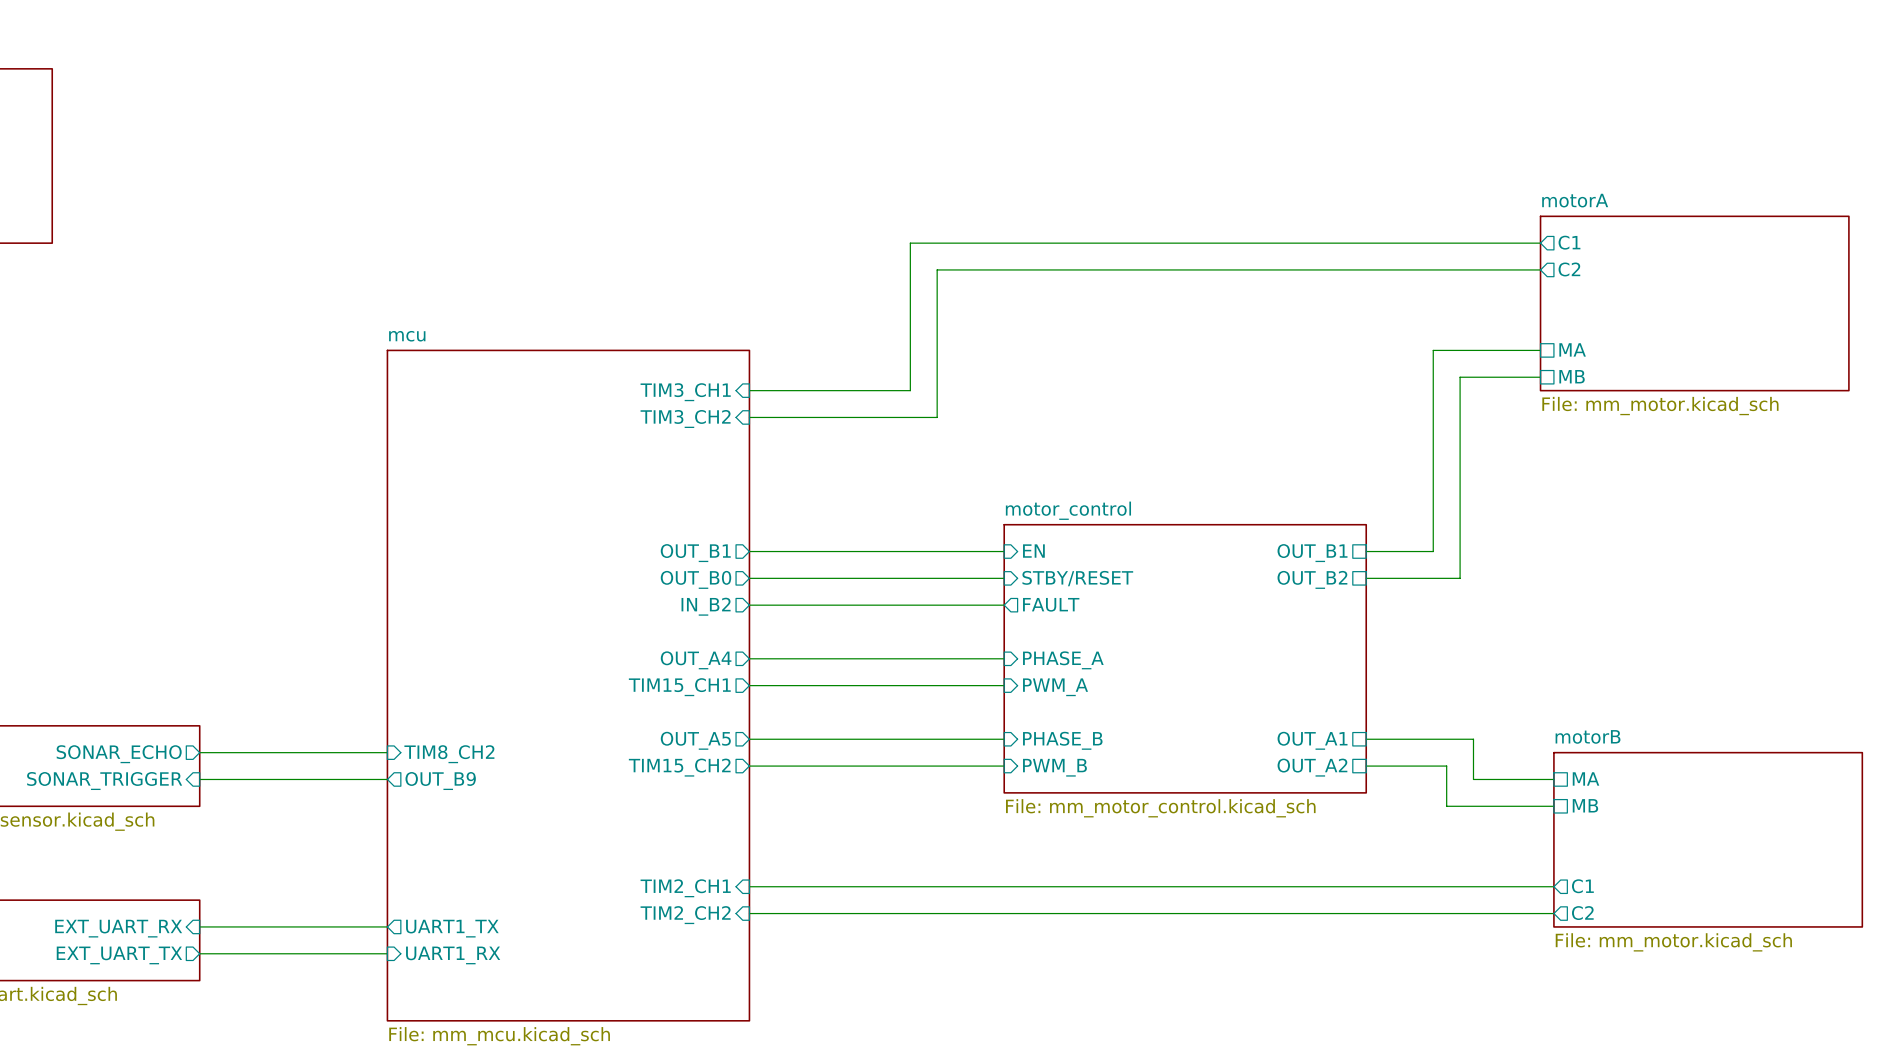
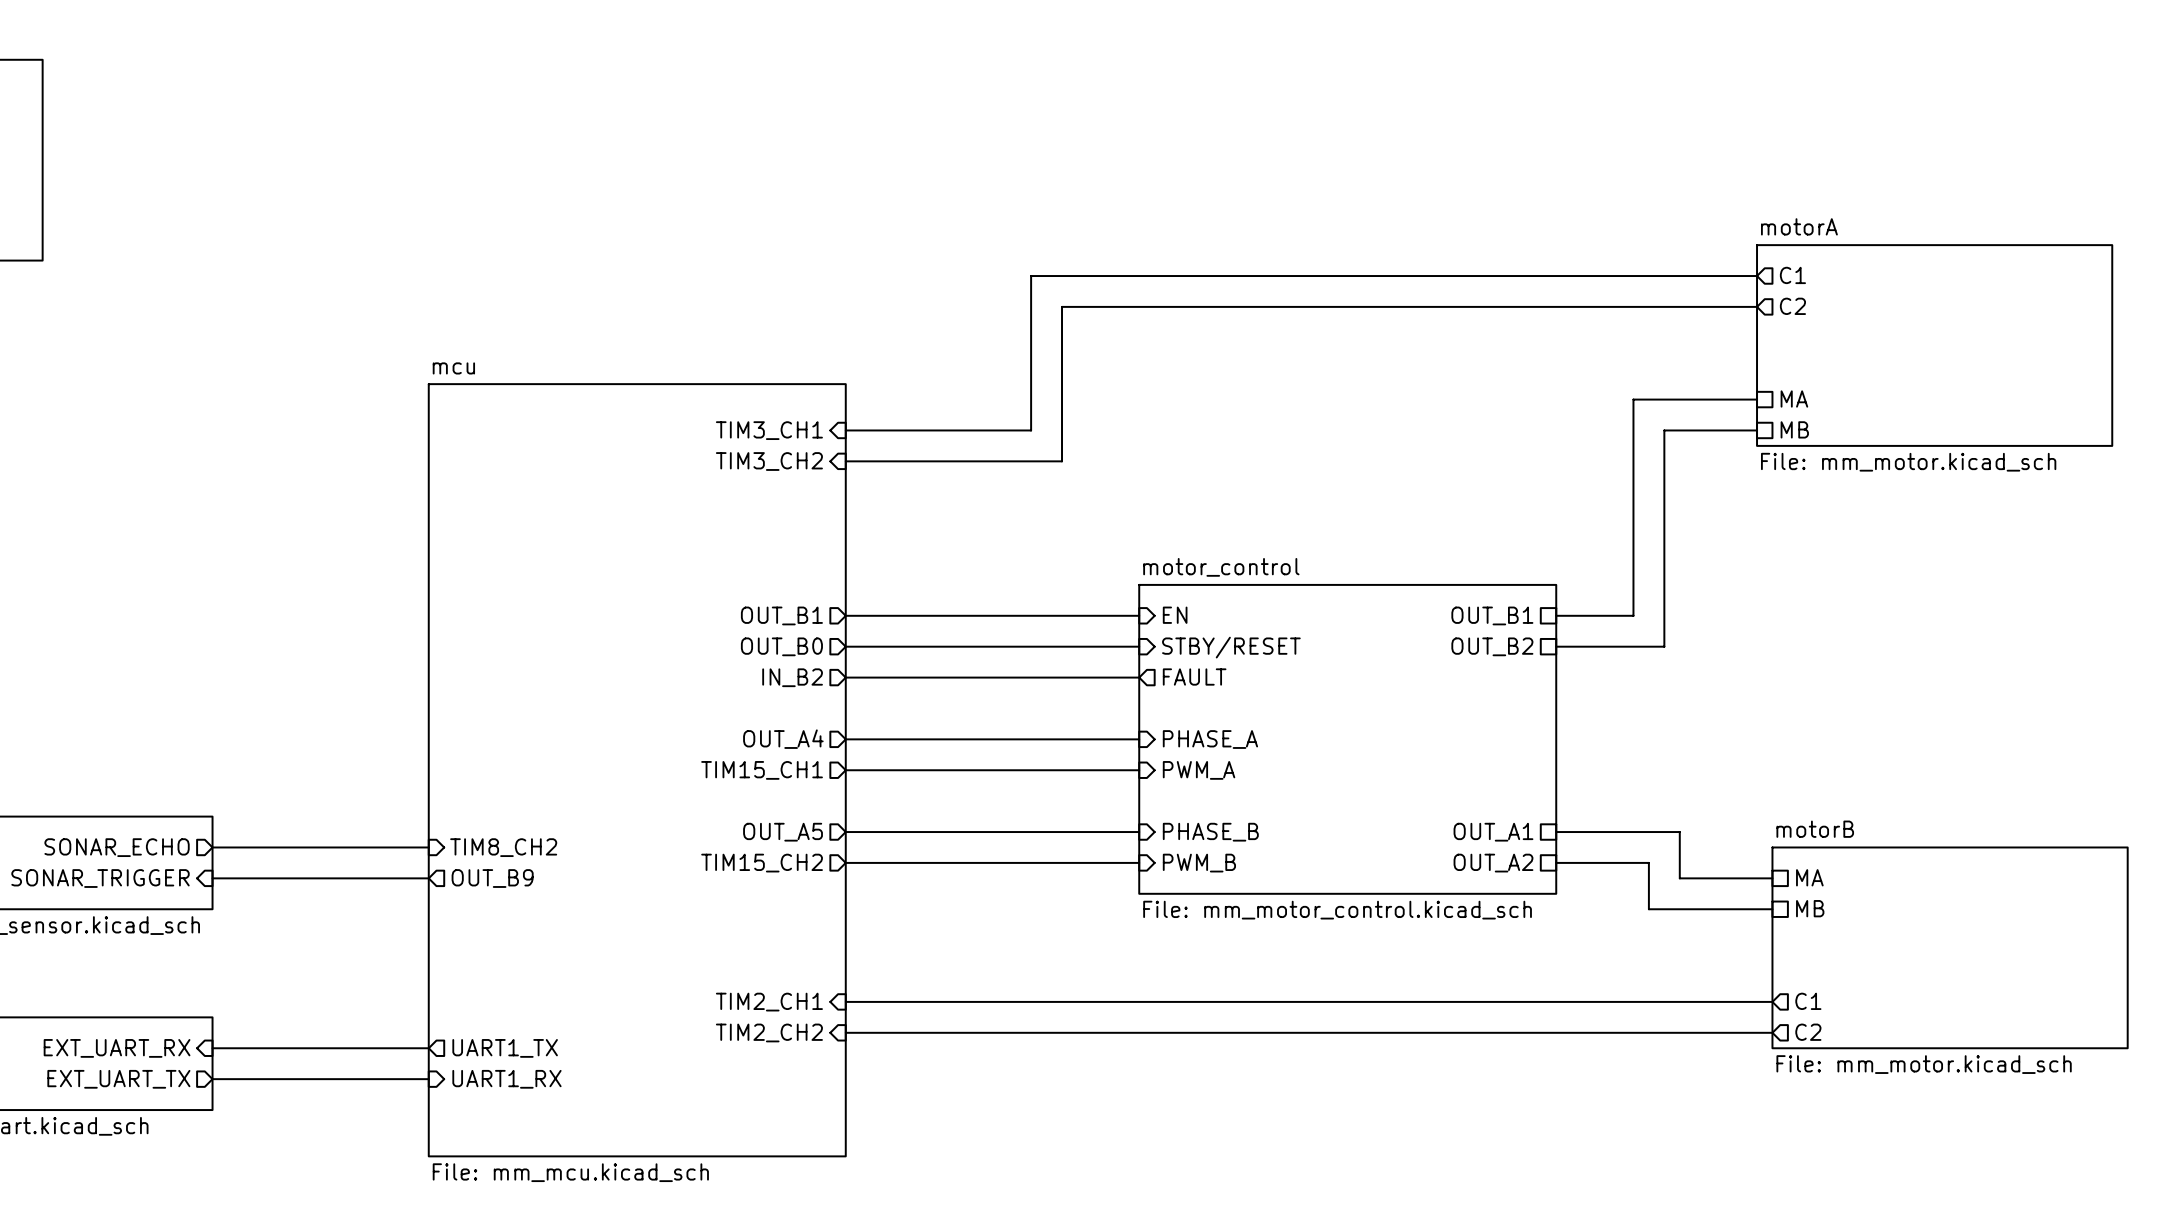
sheet pin position: C1 (1569, 242) -> C1 (1792, 275)
wire: (1540, 243) (910, 243) (910, 256) -> (1757, 276) (1031, 276)
wire: (1540, 269) (937, 269) (937, 283) -> (1757, 306) (1062, 306)
sheet pin position: C2 (1569, 269) -> C2 (1792, 306)
sheet motorA position: (1694, 303) -> (1934, 345)
sheet pin position: MA (1572, 349) -> MA (1794, 399)
wire: (1540, 350) (1433, 350) (1433, 363) -> (1757, 399) (1633, 399)
sheet pin position: MB (1572, 376) -> MB (1794, 429)
wire: (1540, 377) (1460, 377) (1460, 390) -> (1757, 430) (1664, 430)

